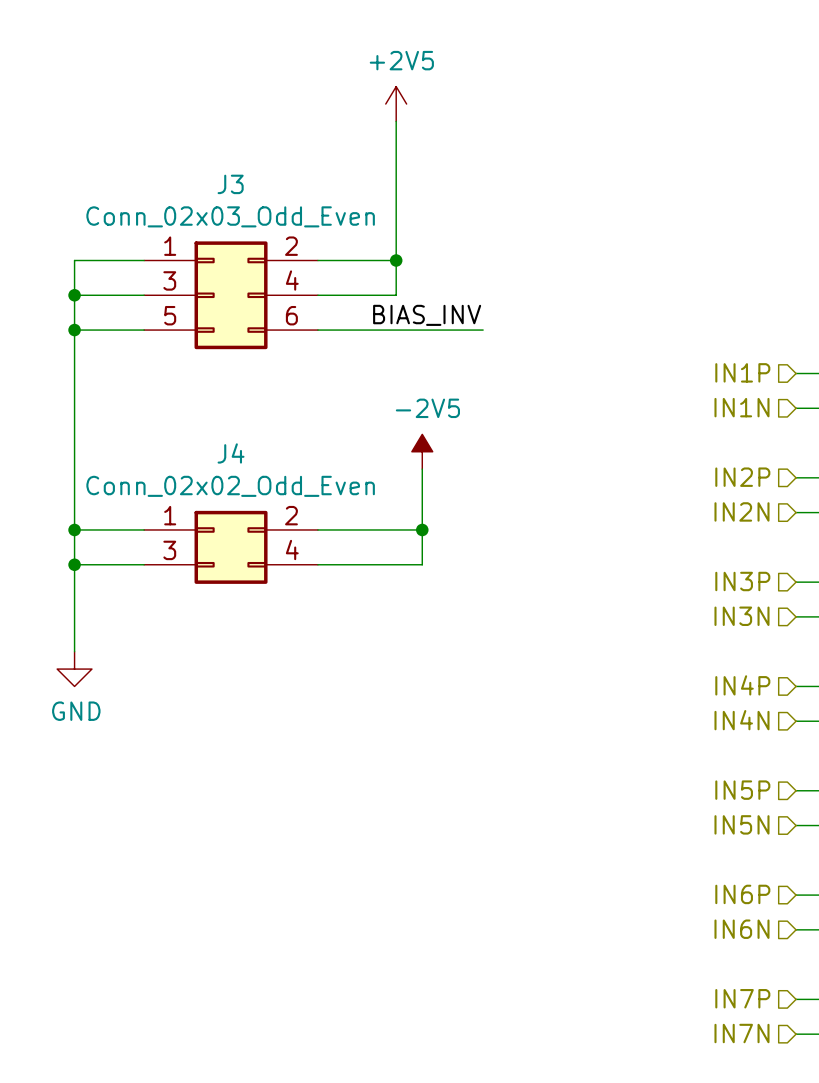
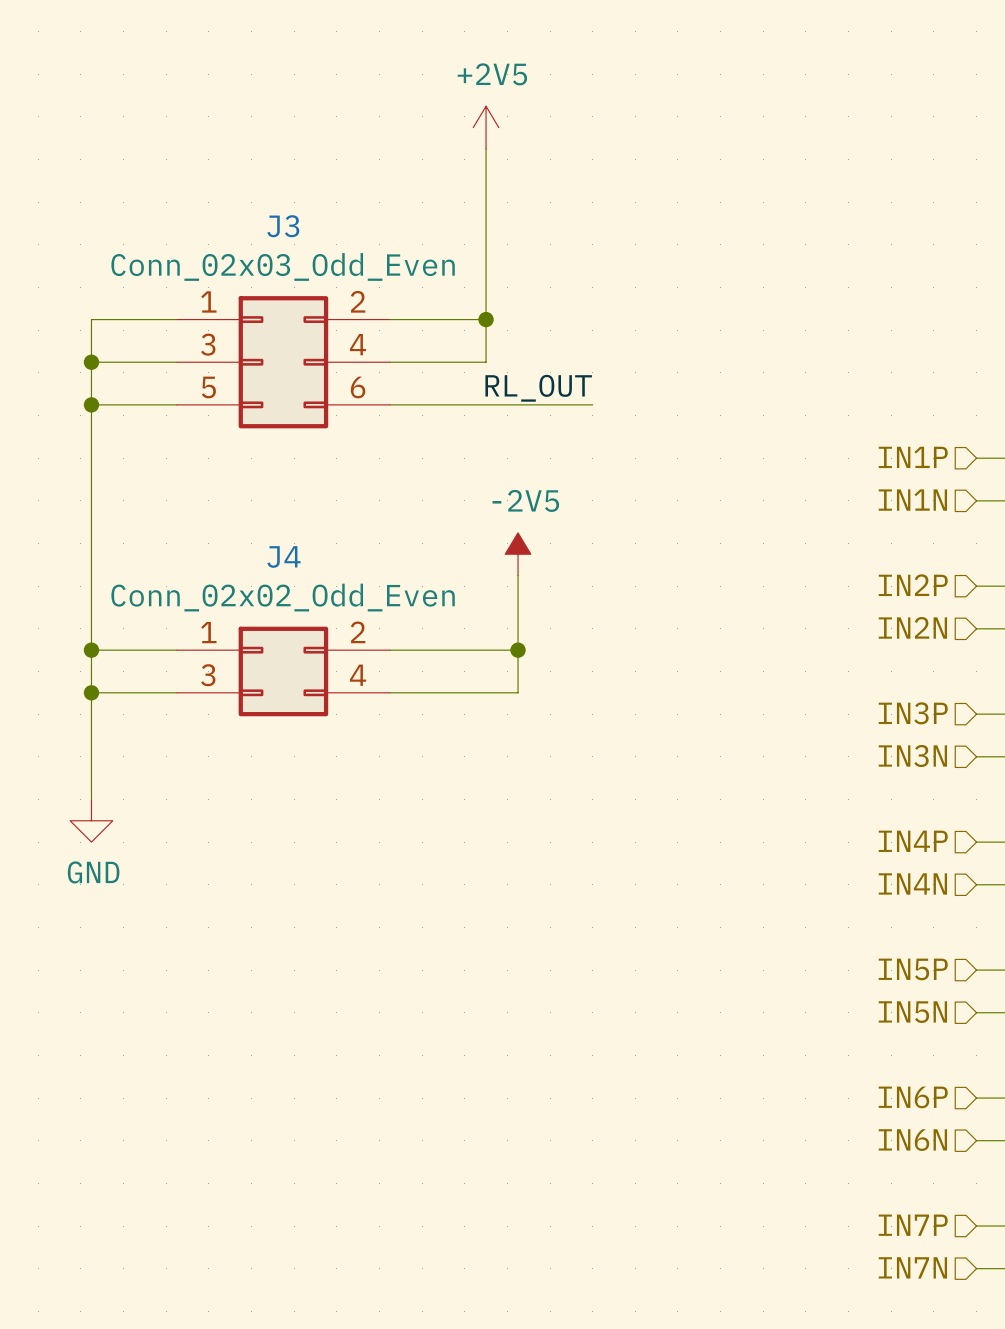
label: BIAS_INV (427, 315) -> RL_OUT (538, 388)

